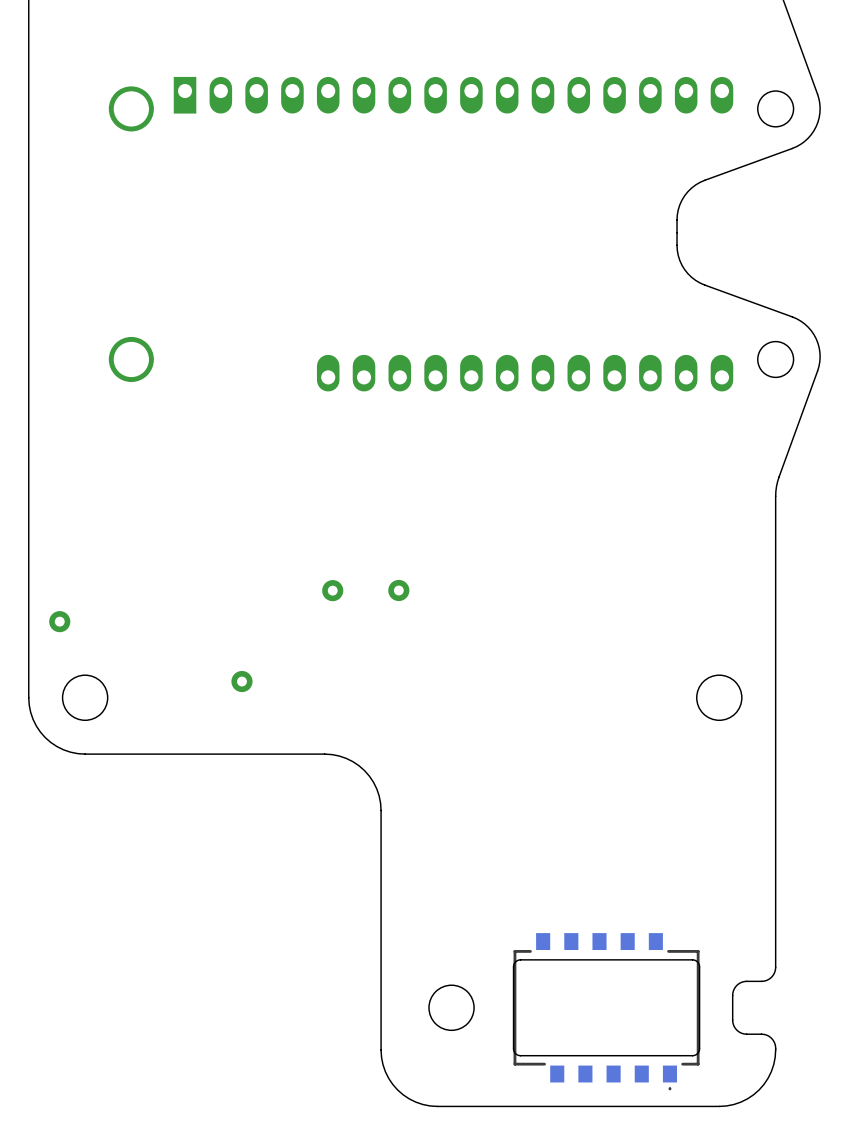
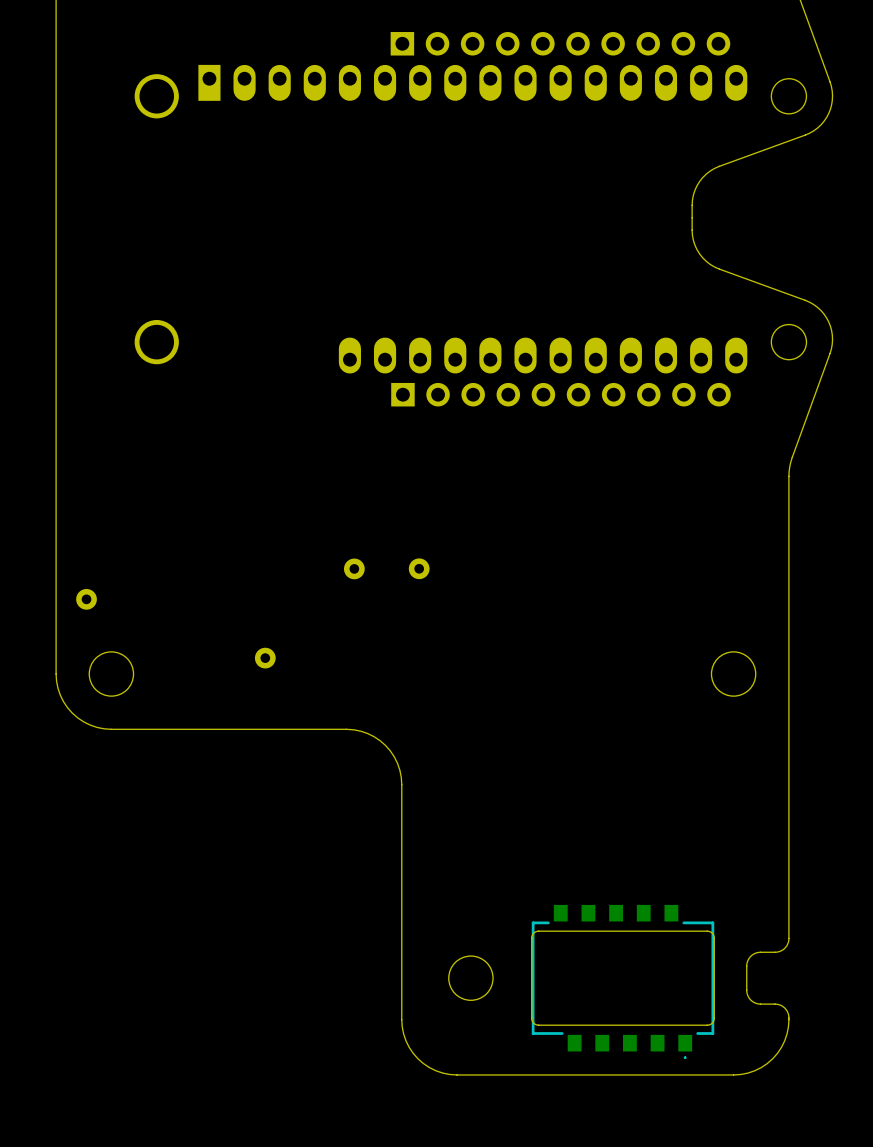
part: none -> (560, 43)
part: none -> (560, 394)

